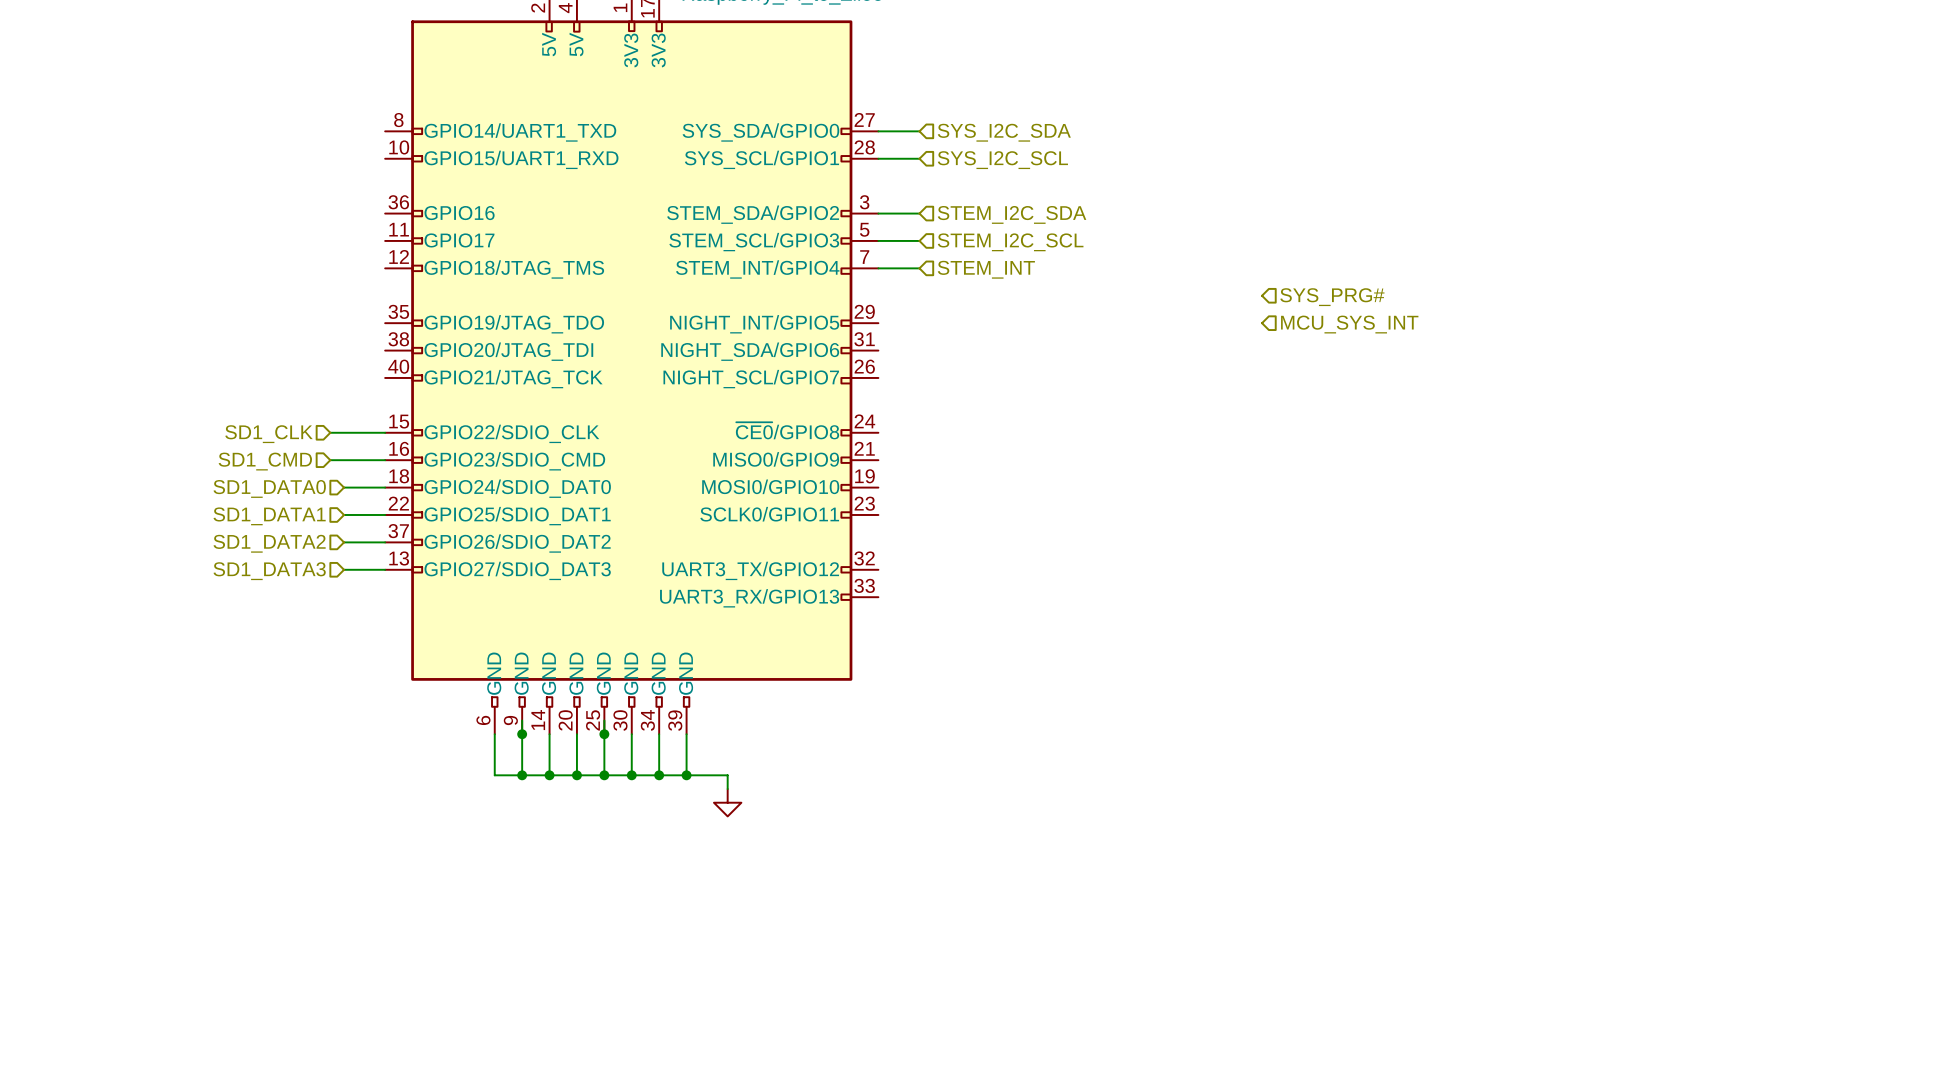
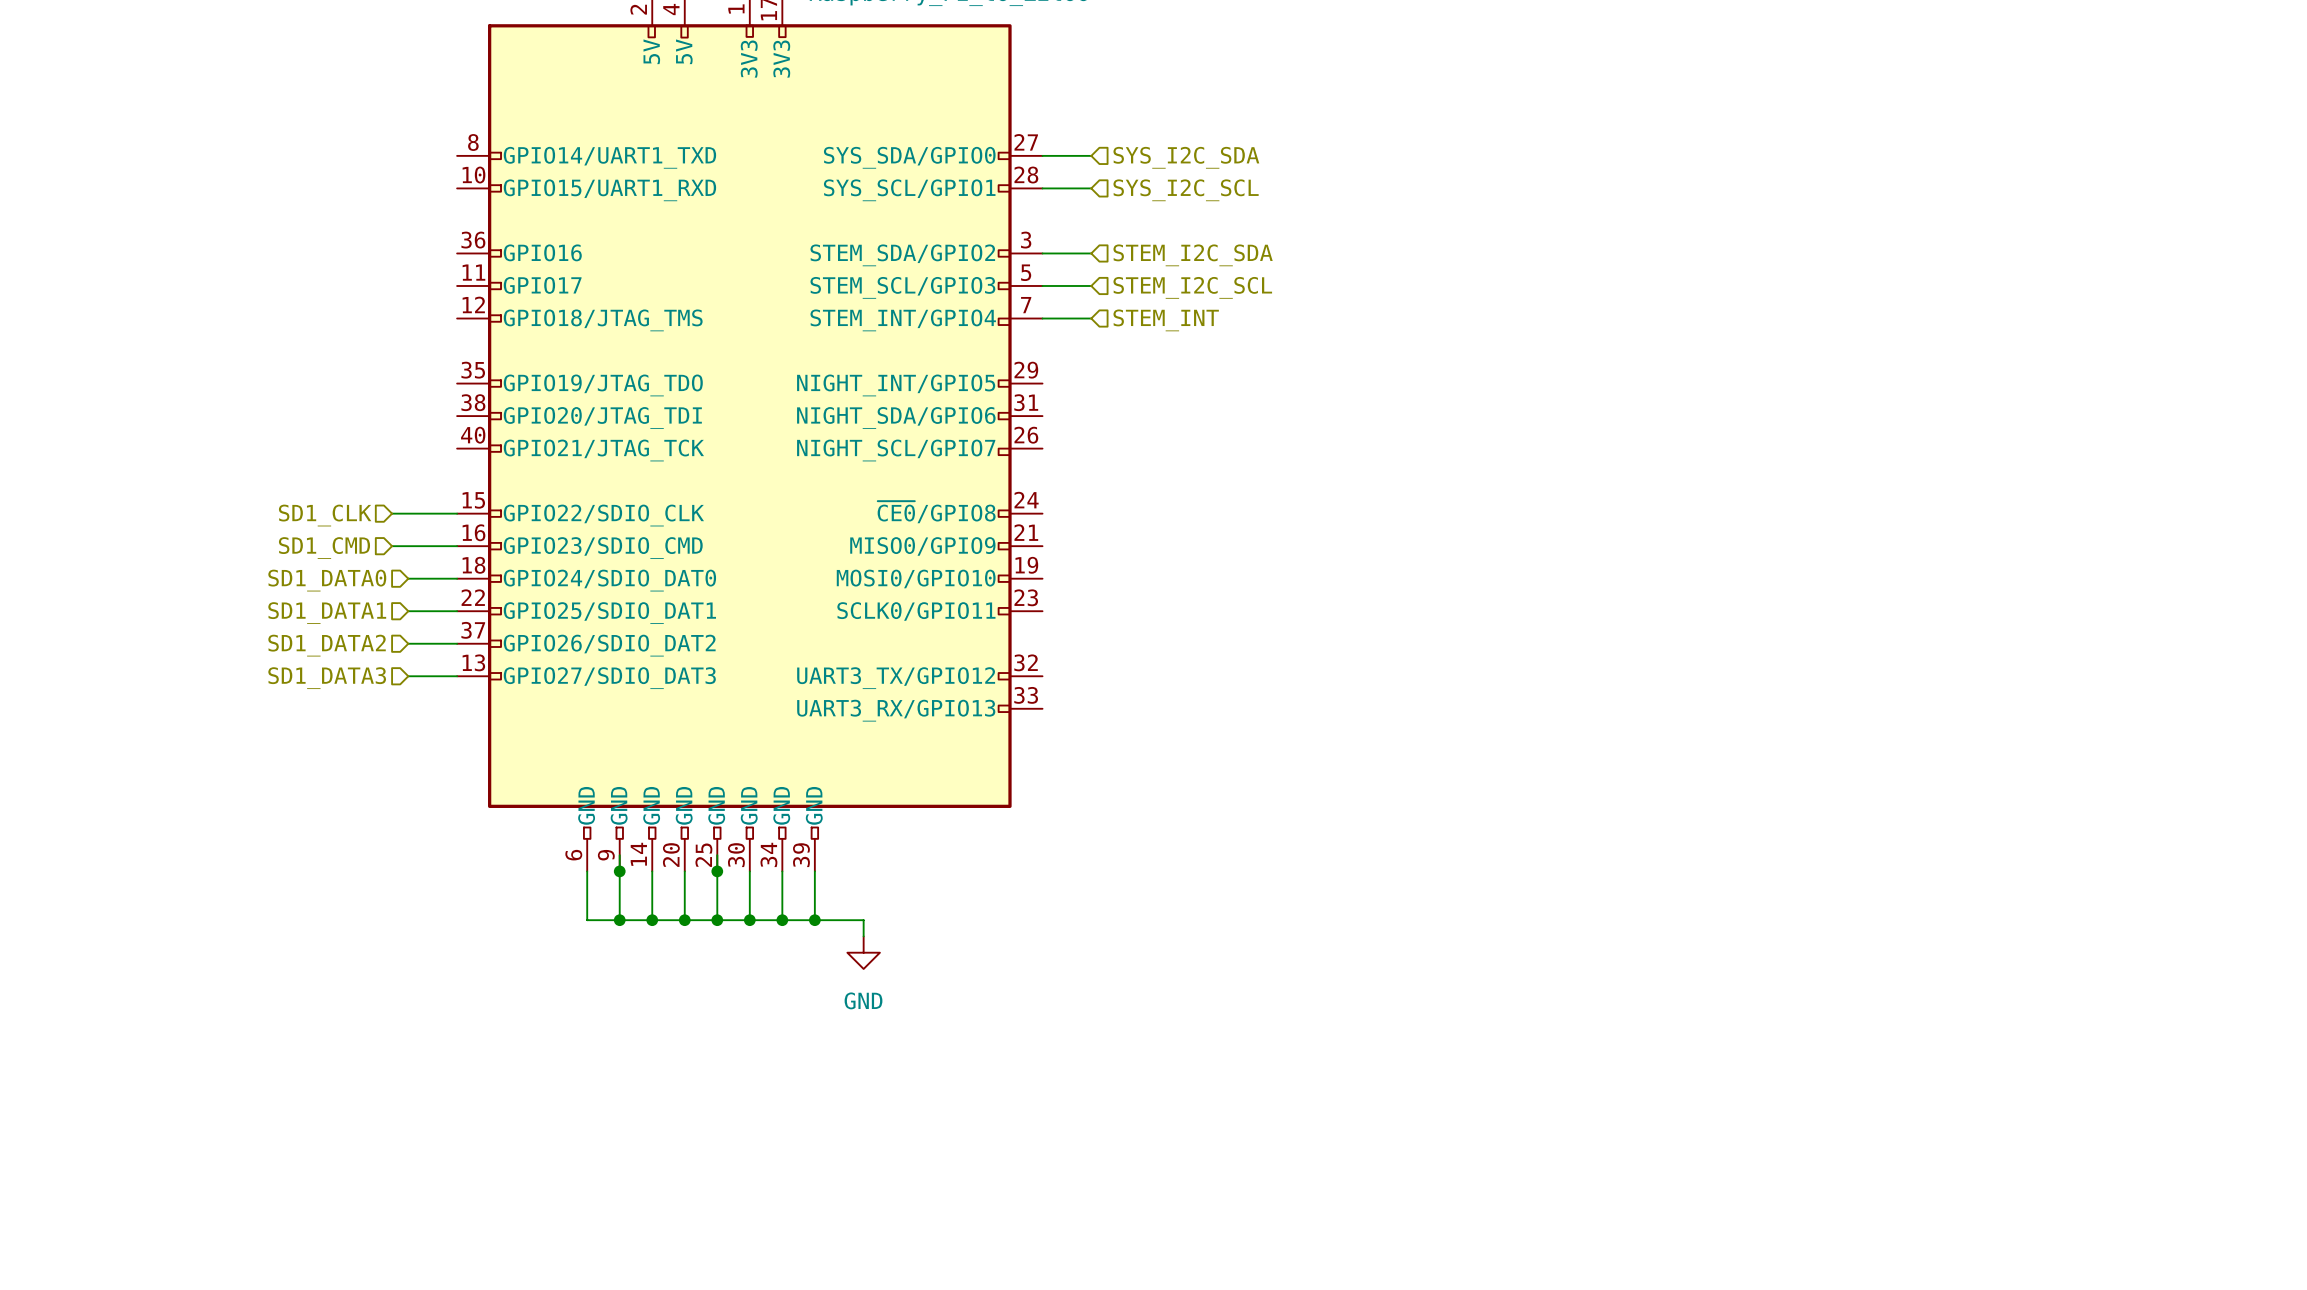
hierarchical label: SYS_PRG# (1332, 297) -> none
hierarchical label: MCU_SYS_INT (1349, 324) -> none
power symbol text: none -> GND (863, 1000)

